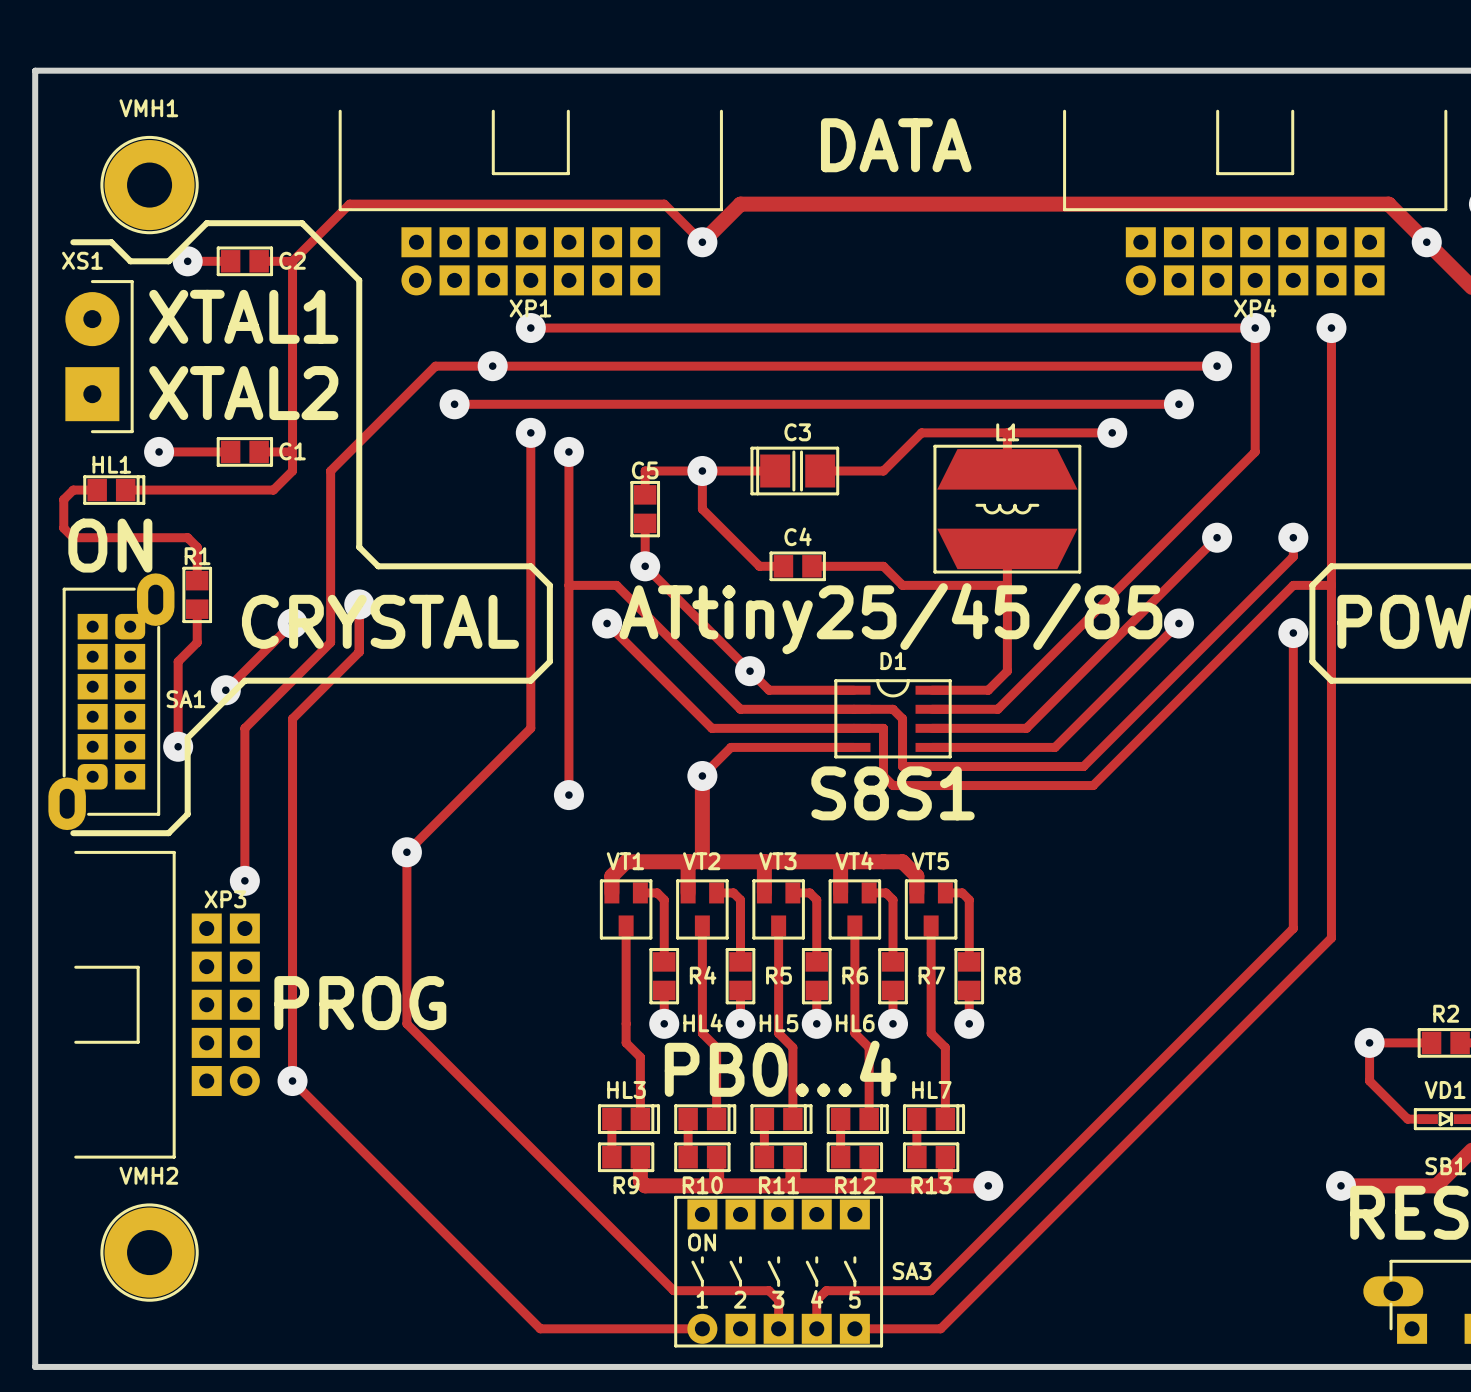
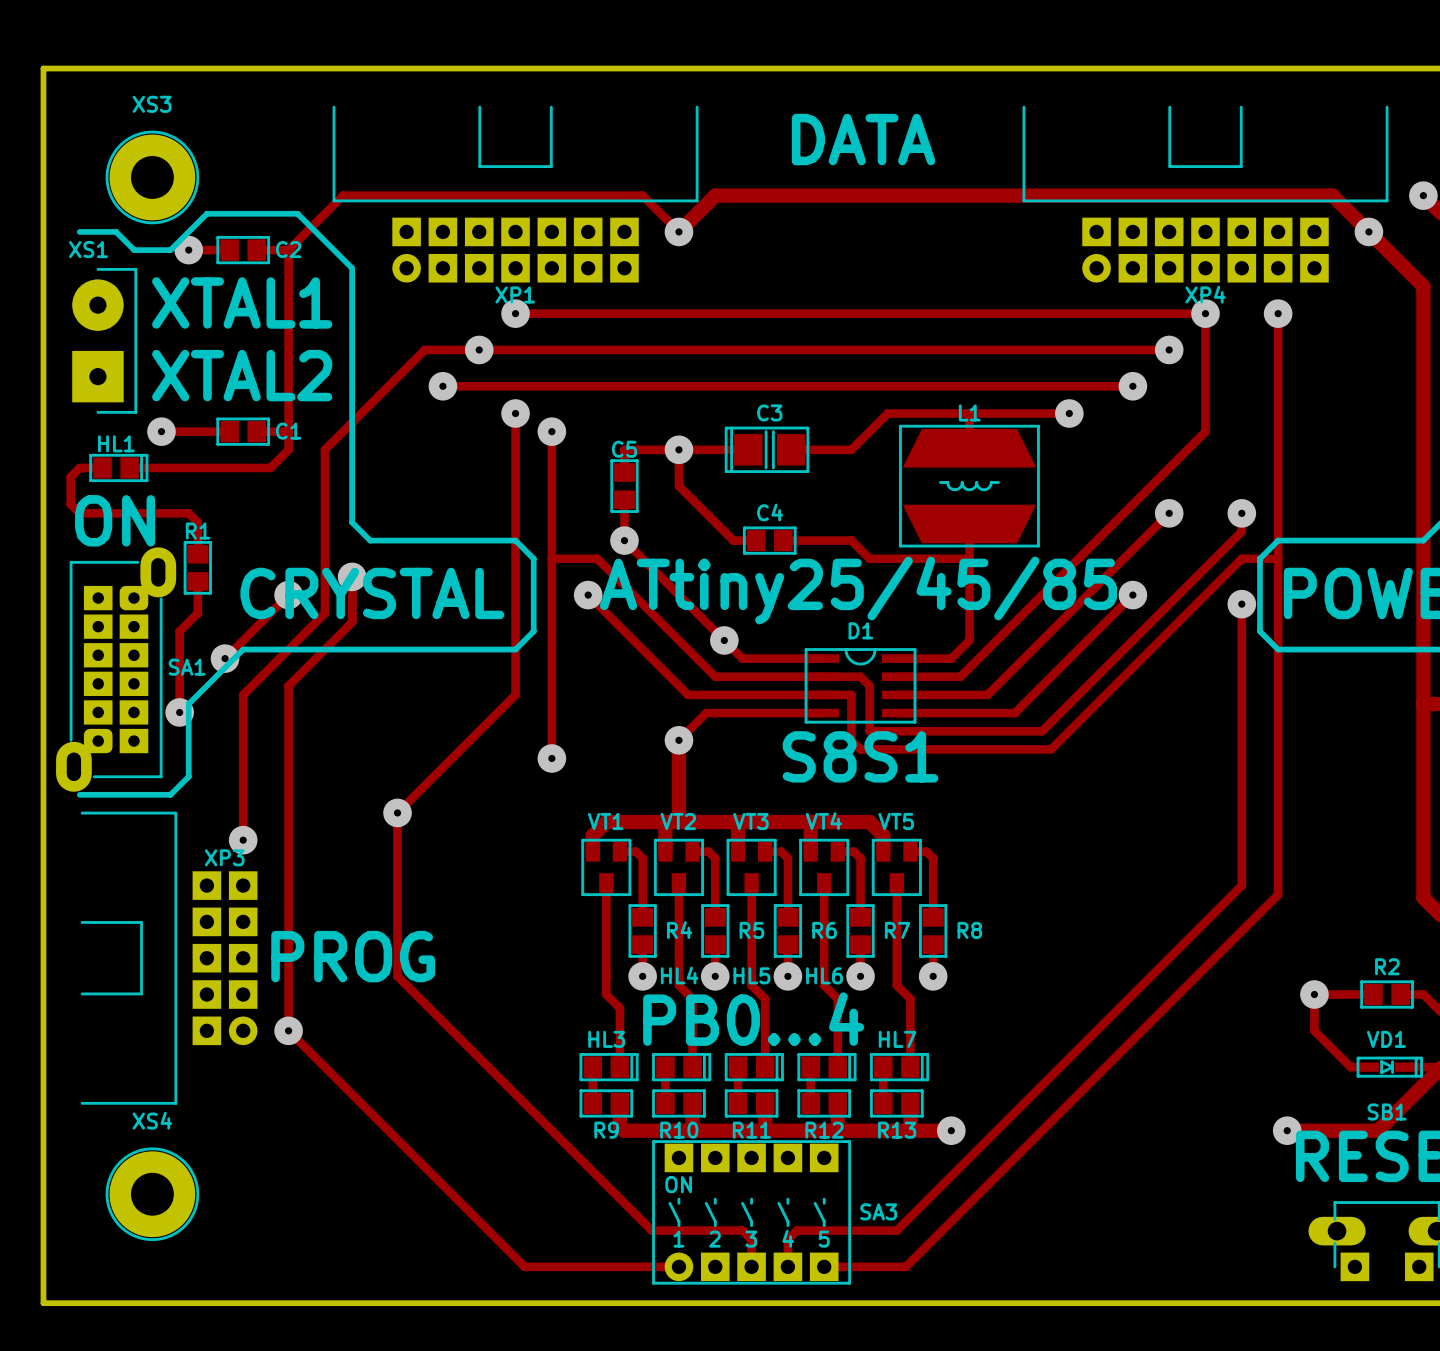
VMH1 name: VMH1 (148, 108) -> XS3 (152, 104)
VMH2 name: VMH2 (148, 1175) -> XS4 (152, 1120)

